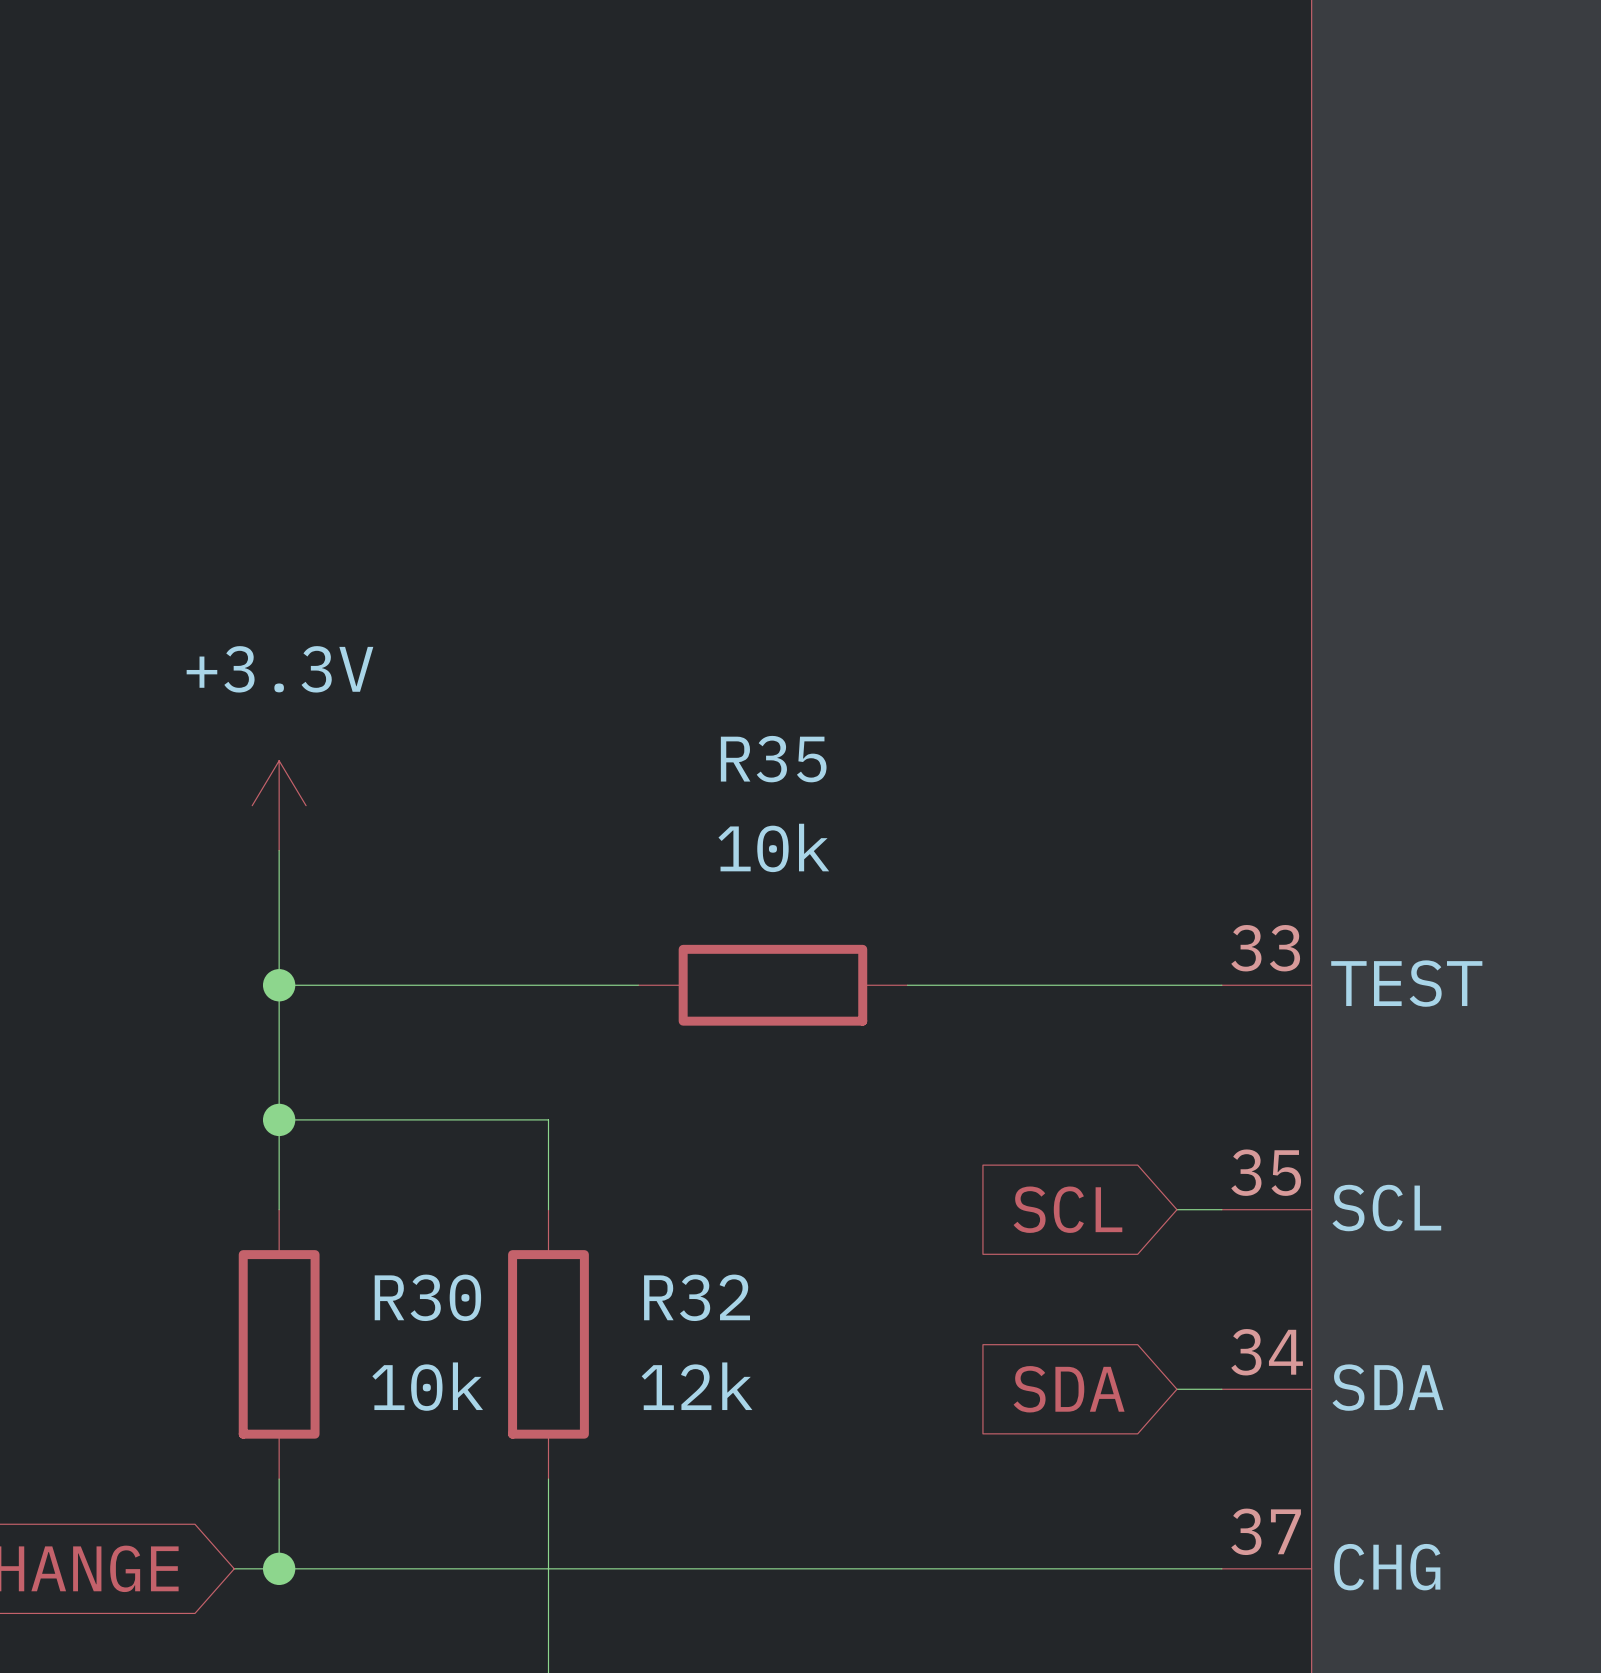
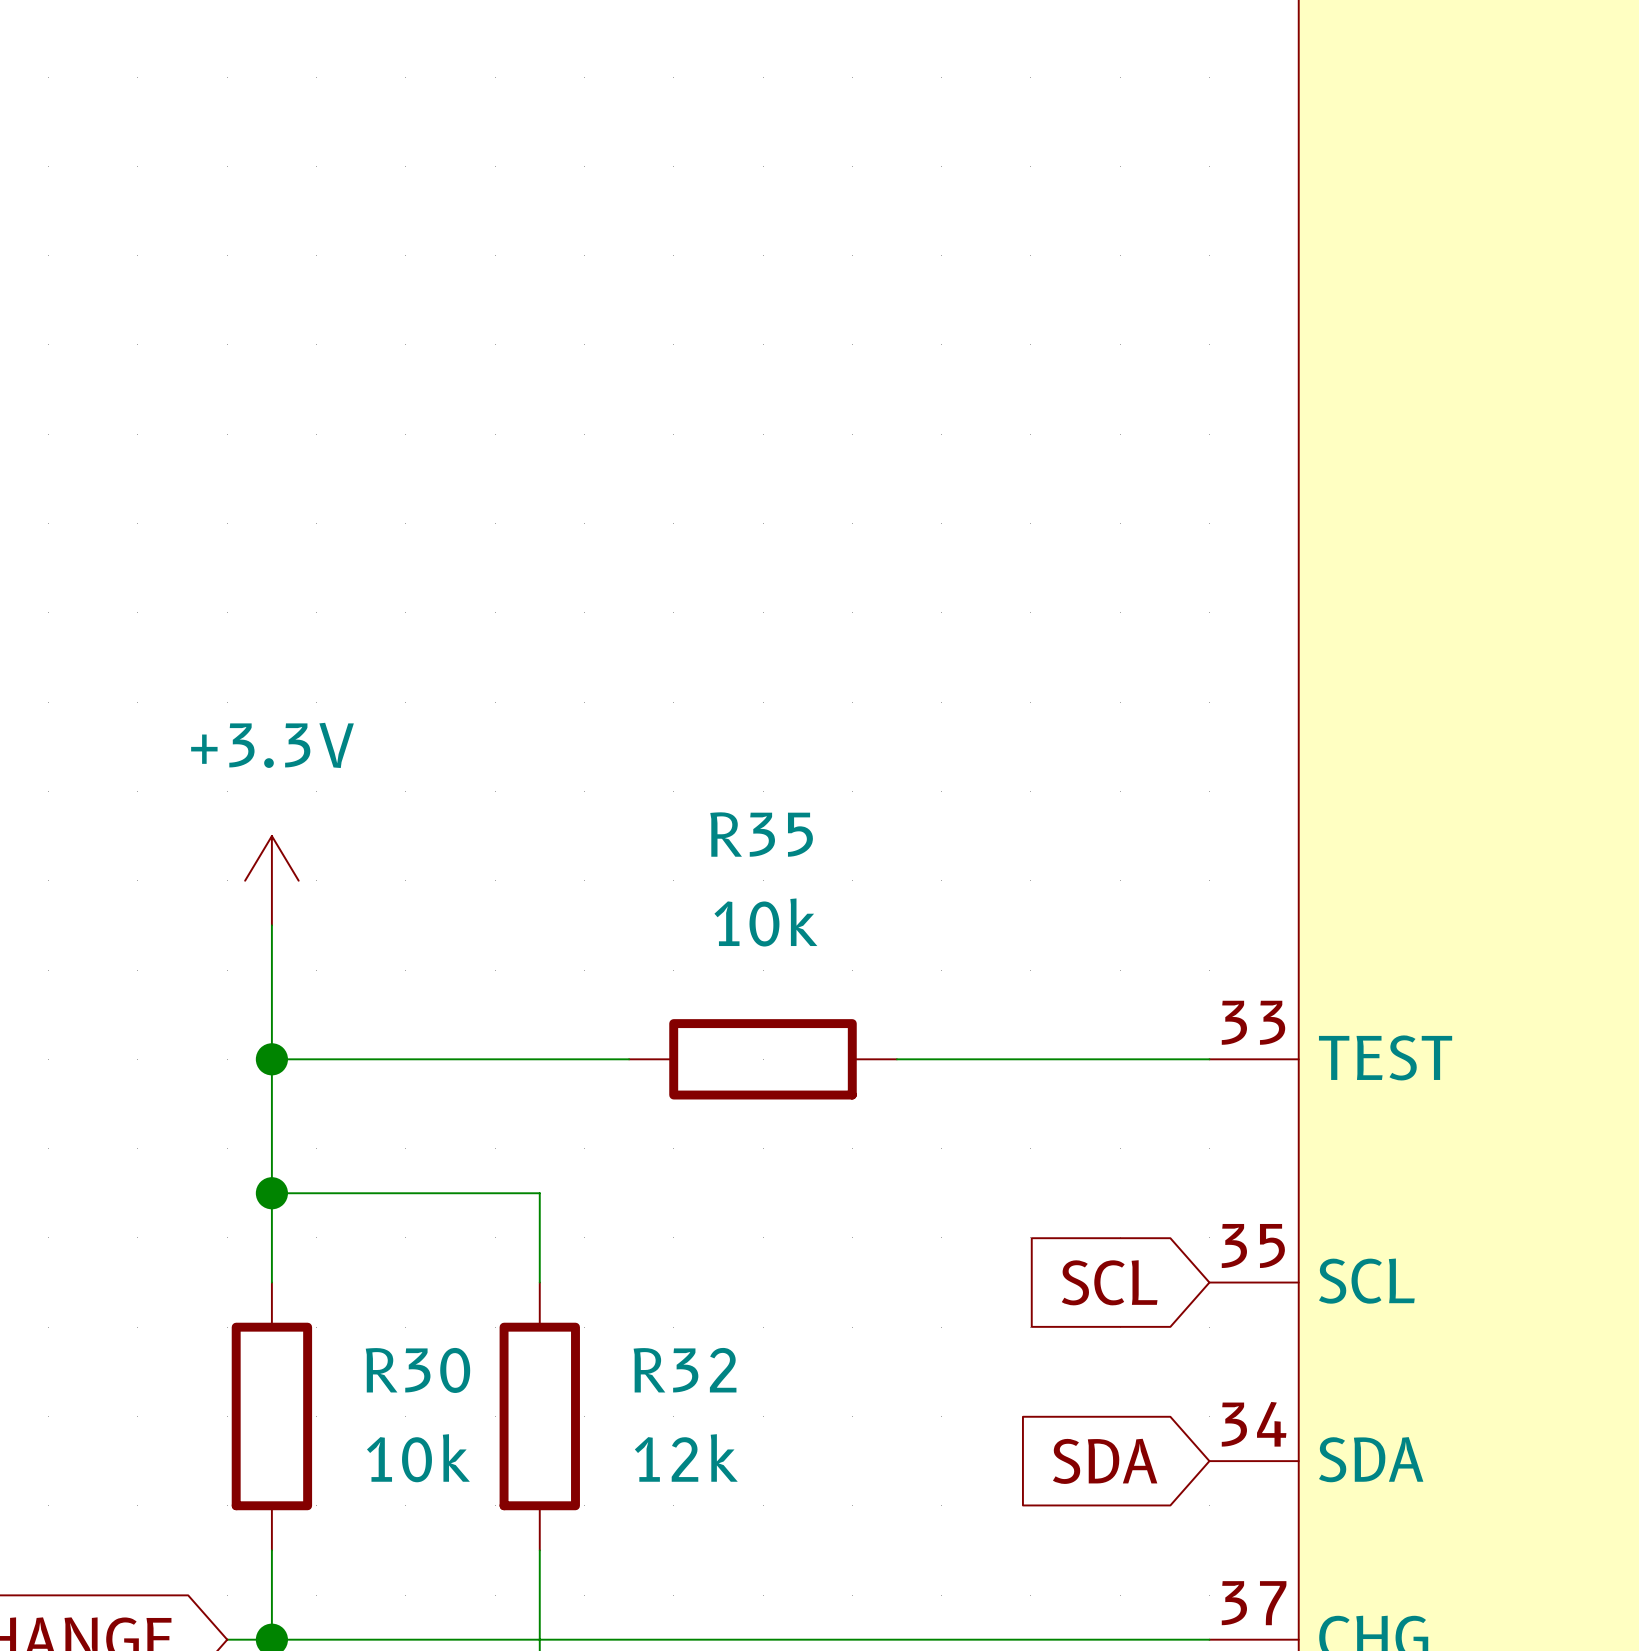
global label position: SCL (1067, 1209) -> SCL (1109, 1282)
wire: (1176, 1209) (1221, 1209) -> none
global label position: SDA (1069, 1389) -> SDA (1105, 1461)
wire: (1176, 1389) (1221, 1389) -> none

